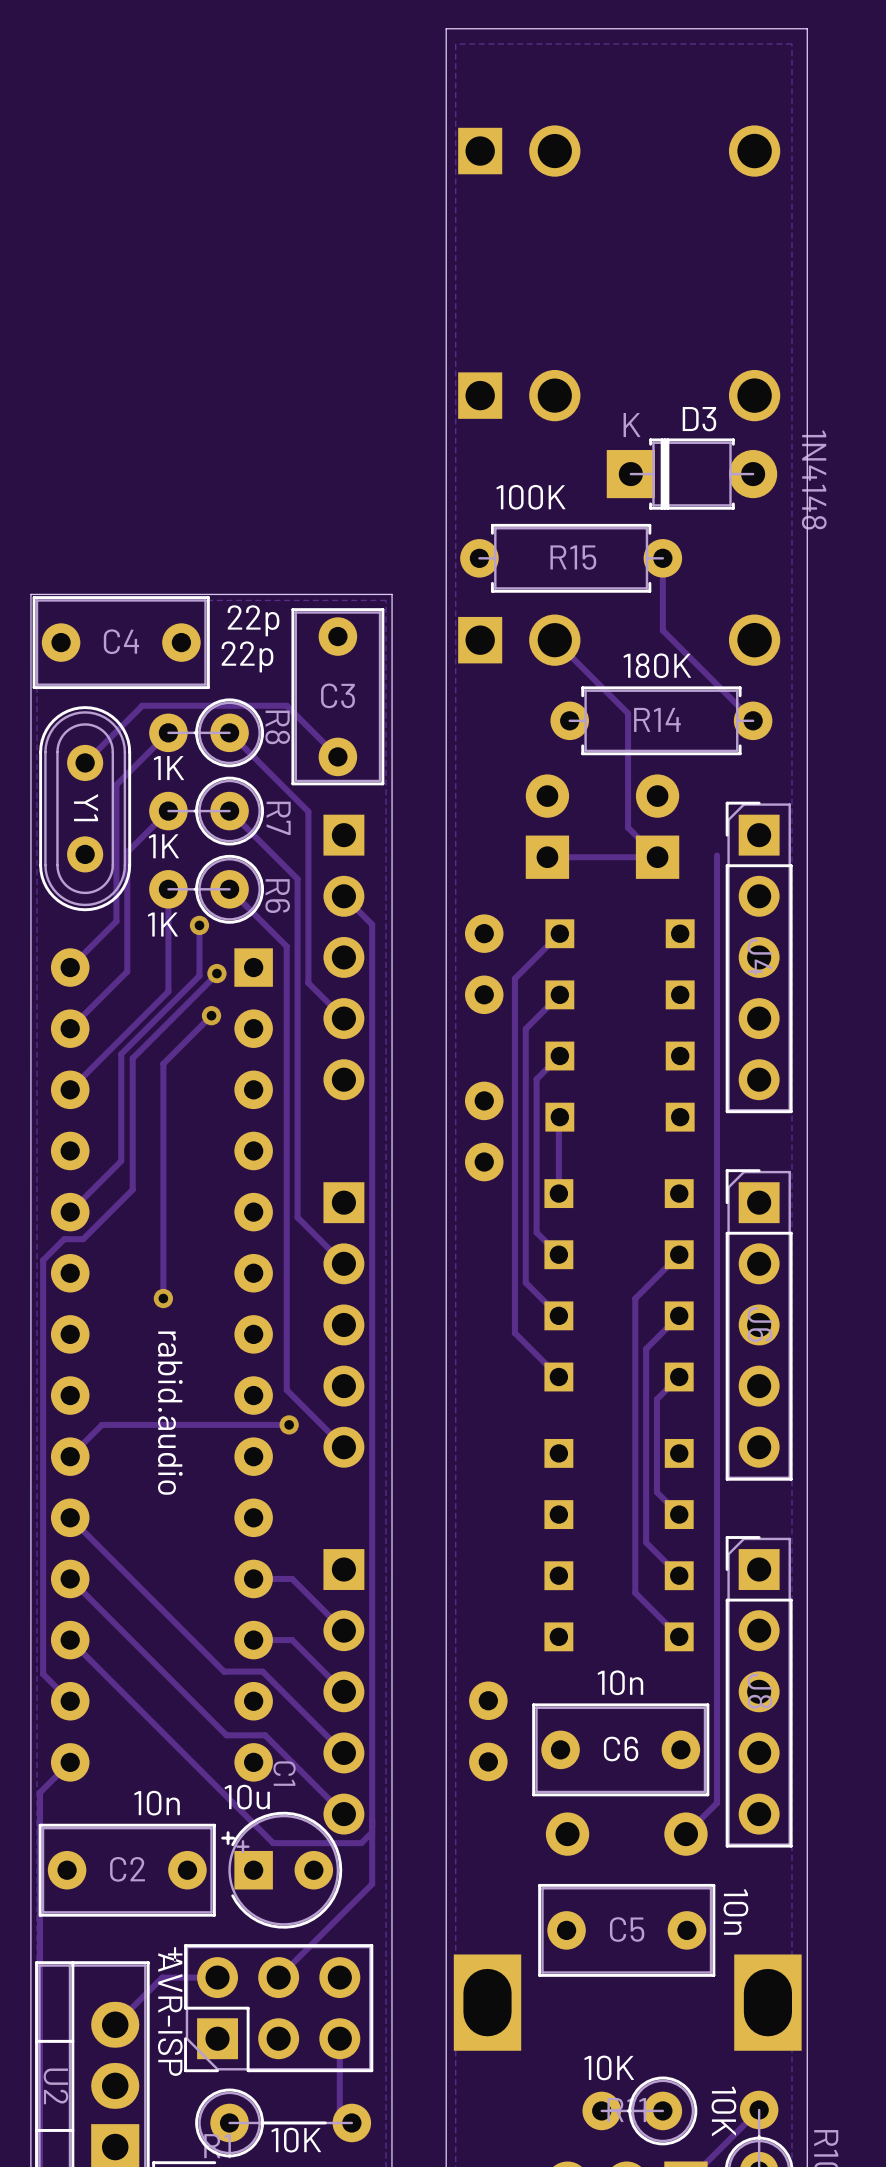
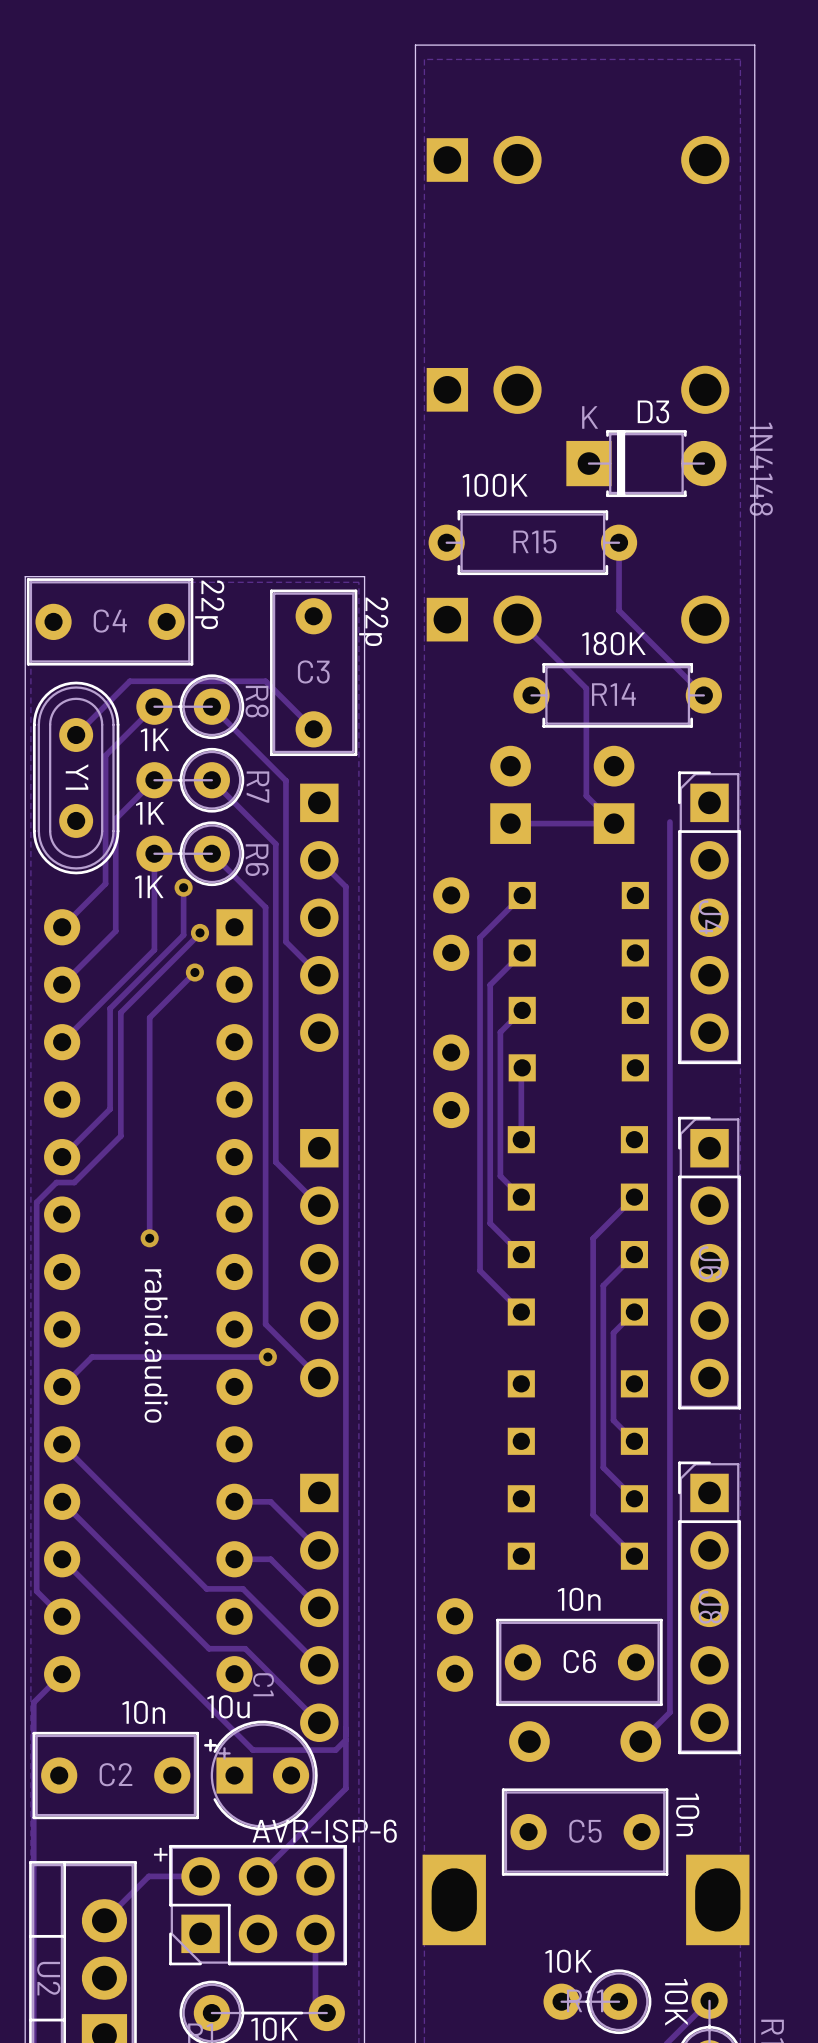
C3 value rotation: 0° (253, 620) -> 90° clockwise (373, 621)
C3 value position: 22p (253, 620) -> 22p (373, 621)
C4 value rotation: 0° (247, 656) -> 90° clockwise (209, 604)
part value: AVR-ISP (170, 2014) -> AVR-ISP-6 (324, 1831)

